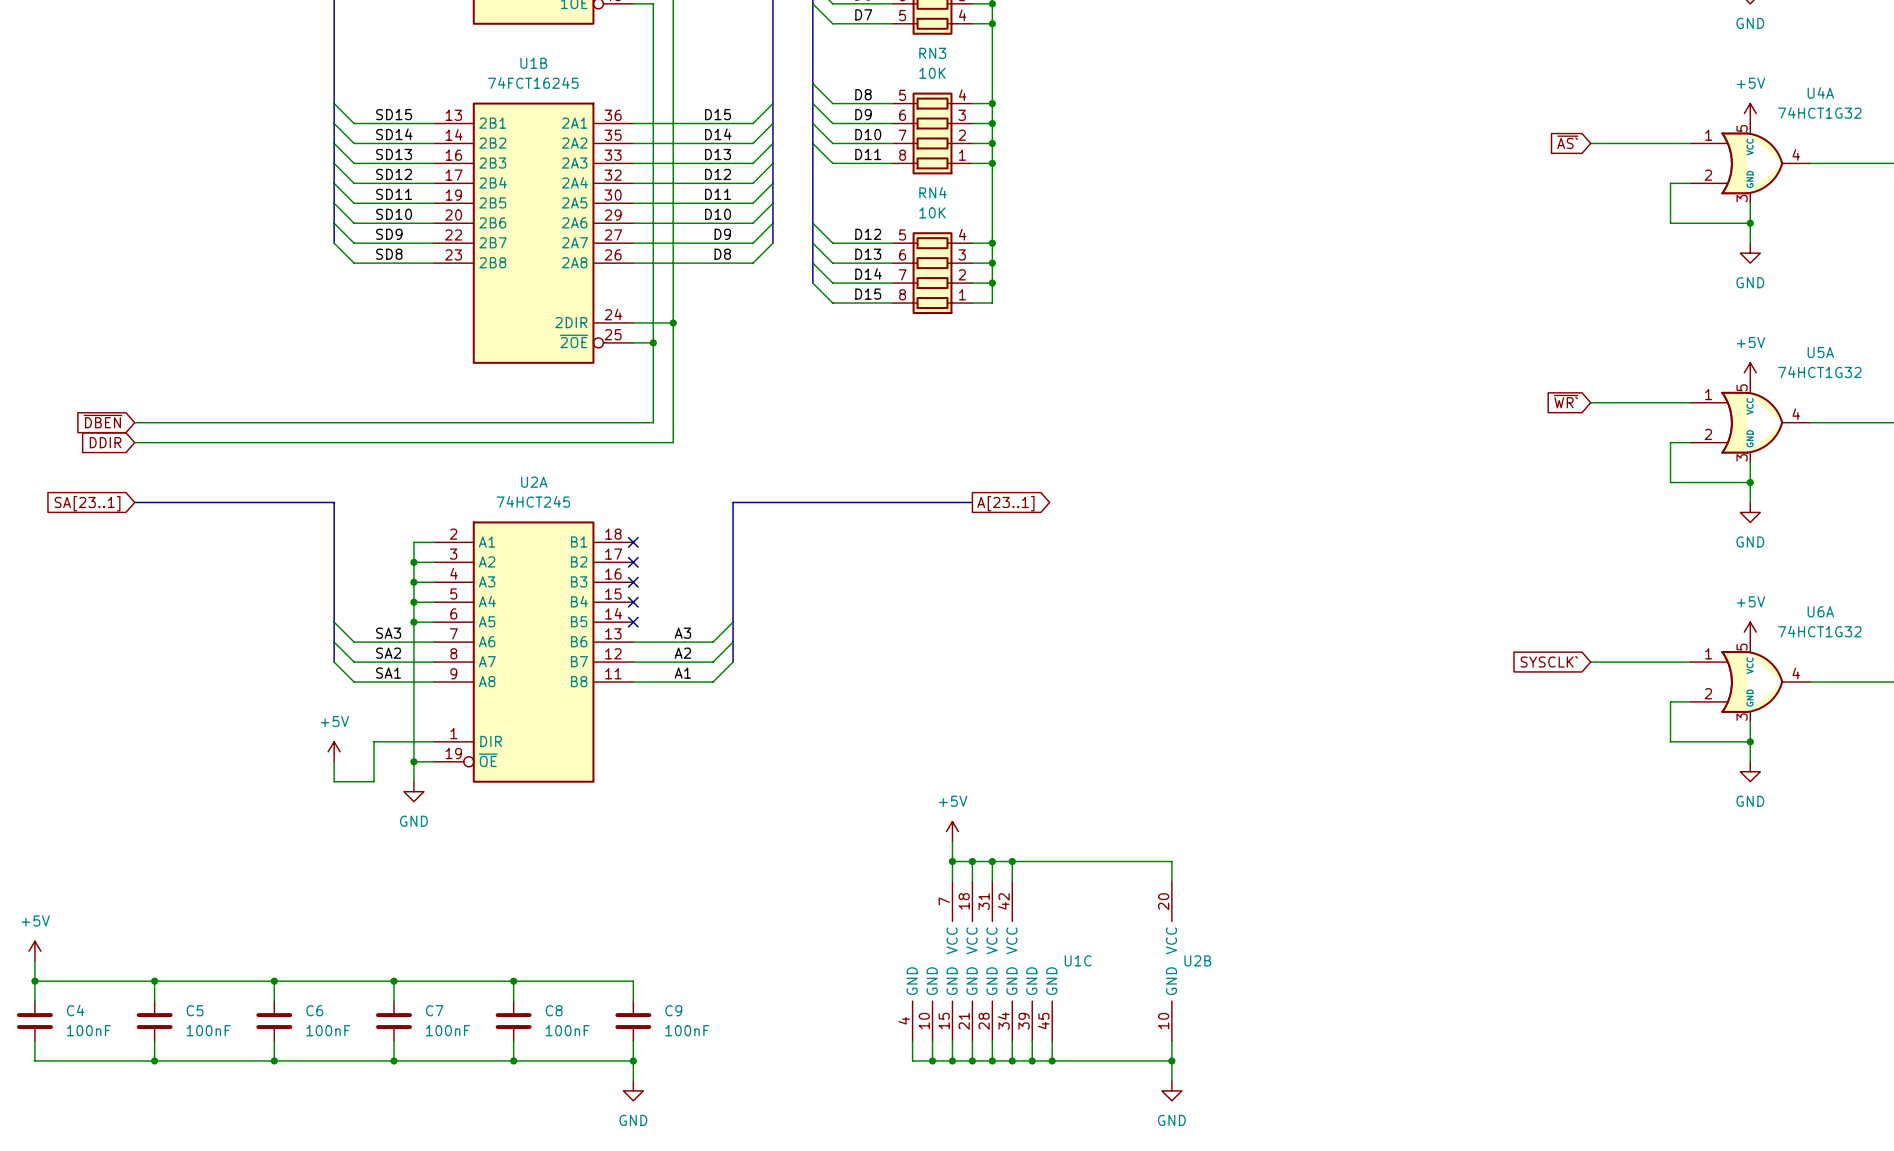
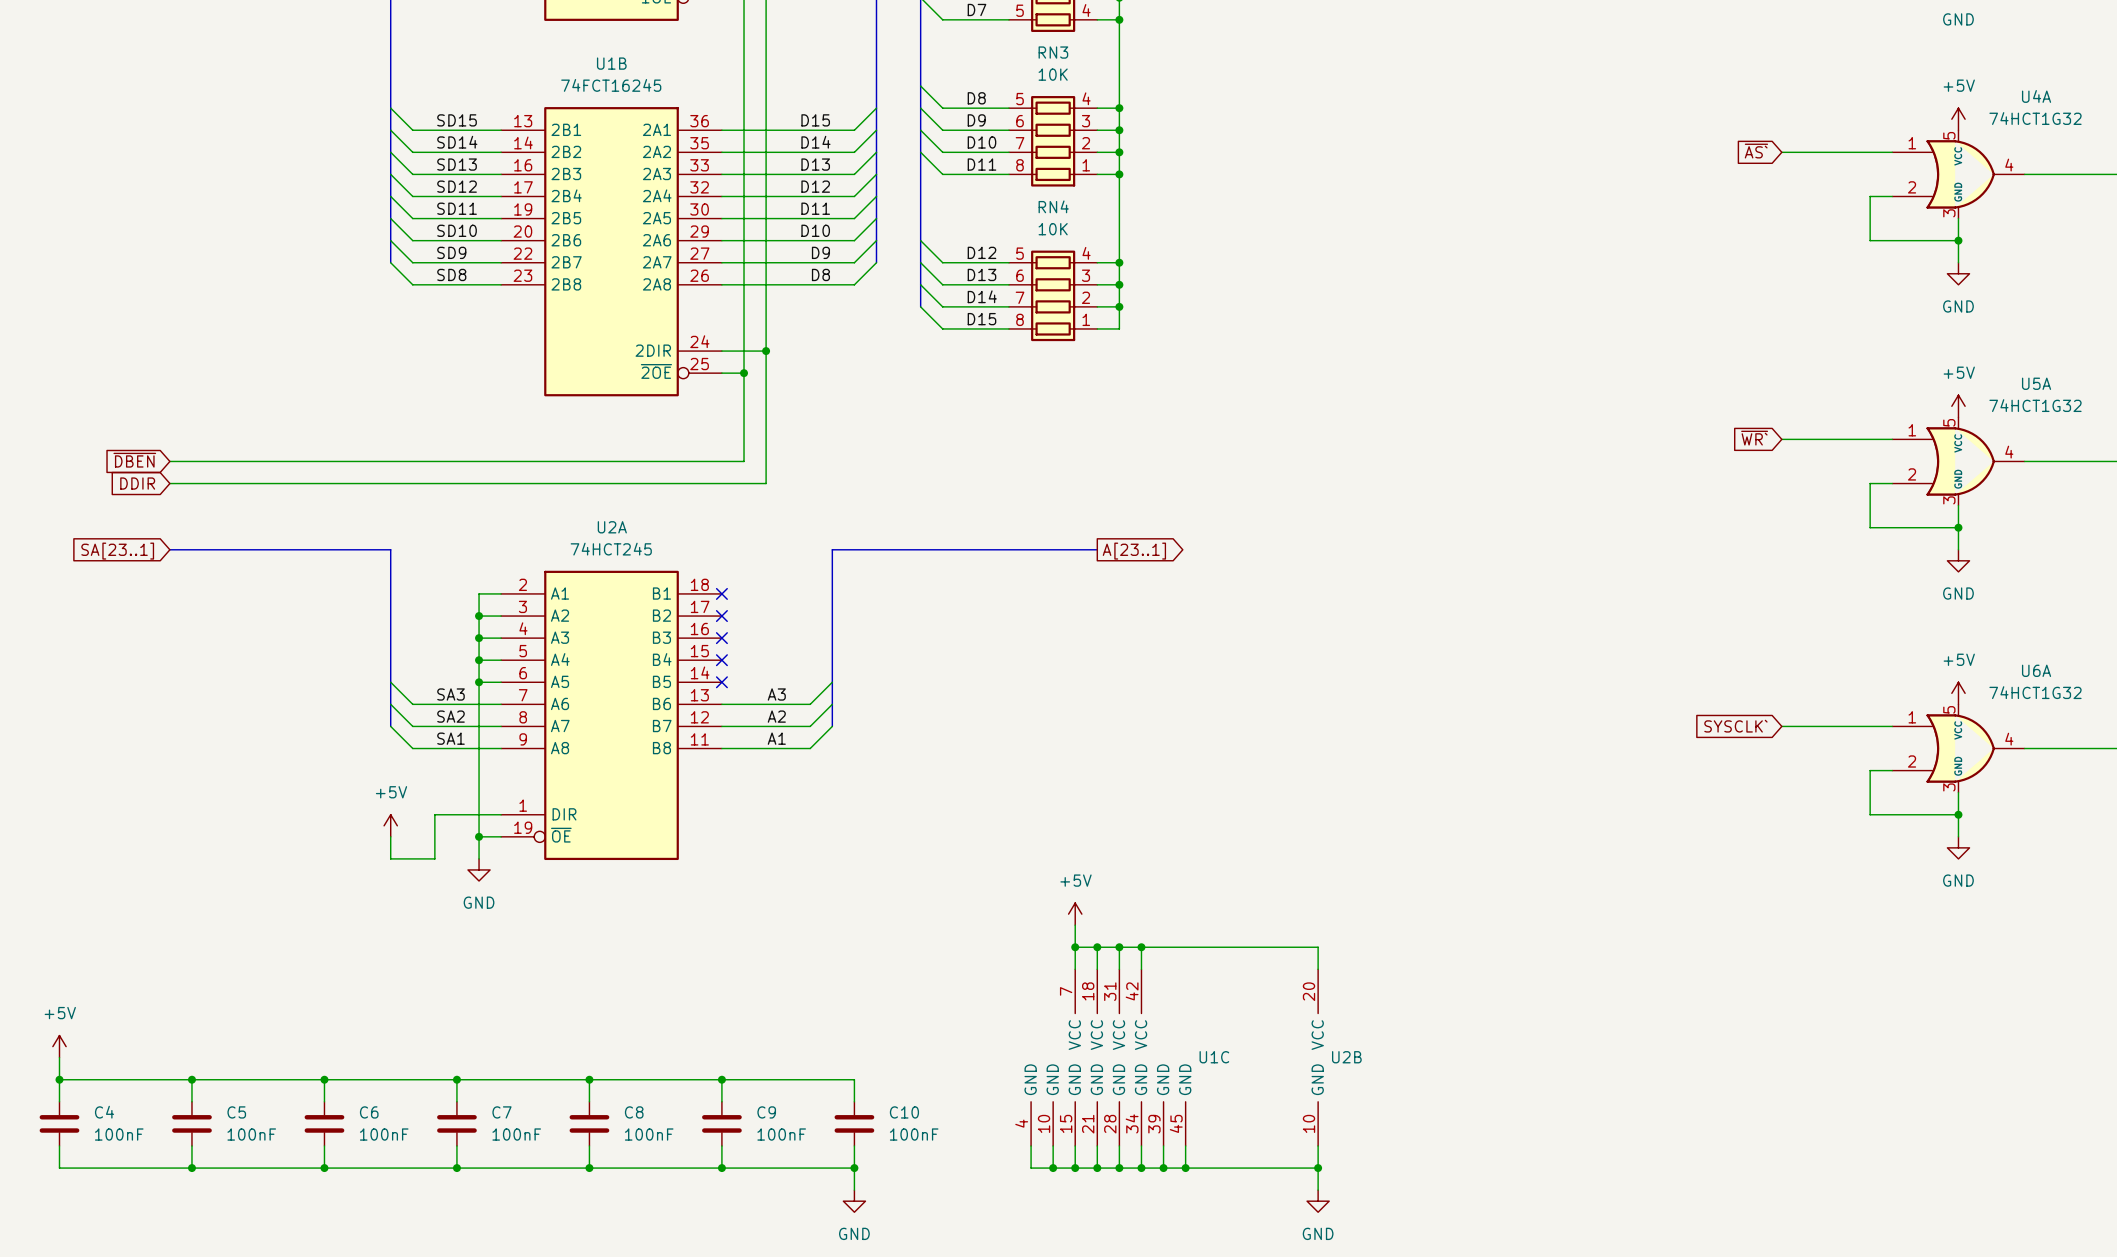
wire: none -> (721, 1079) (854, 1079) (854, 1101)
junction: none -> (721, 1079)
C10: none -> 100nF (854, 1123)
wire: none -> (854, 1145) (854, 1190)
wire: (633, 1060) (633, 1080) -> (721, 1168) (854, 1168)
junction: none -> (854, 1168)
power symbol position: GND (633, 1090) -> GND (854, 1201)

